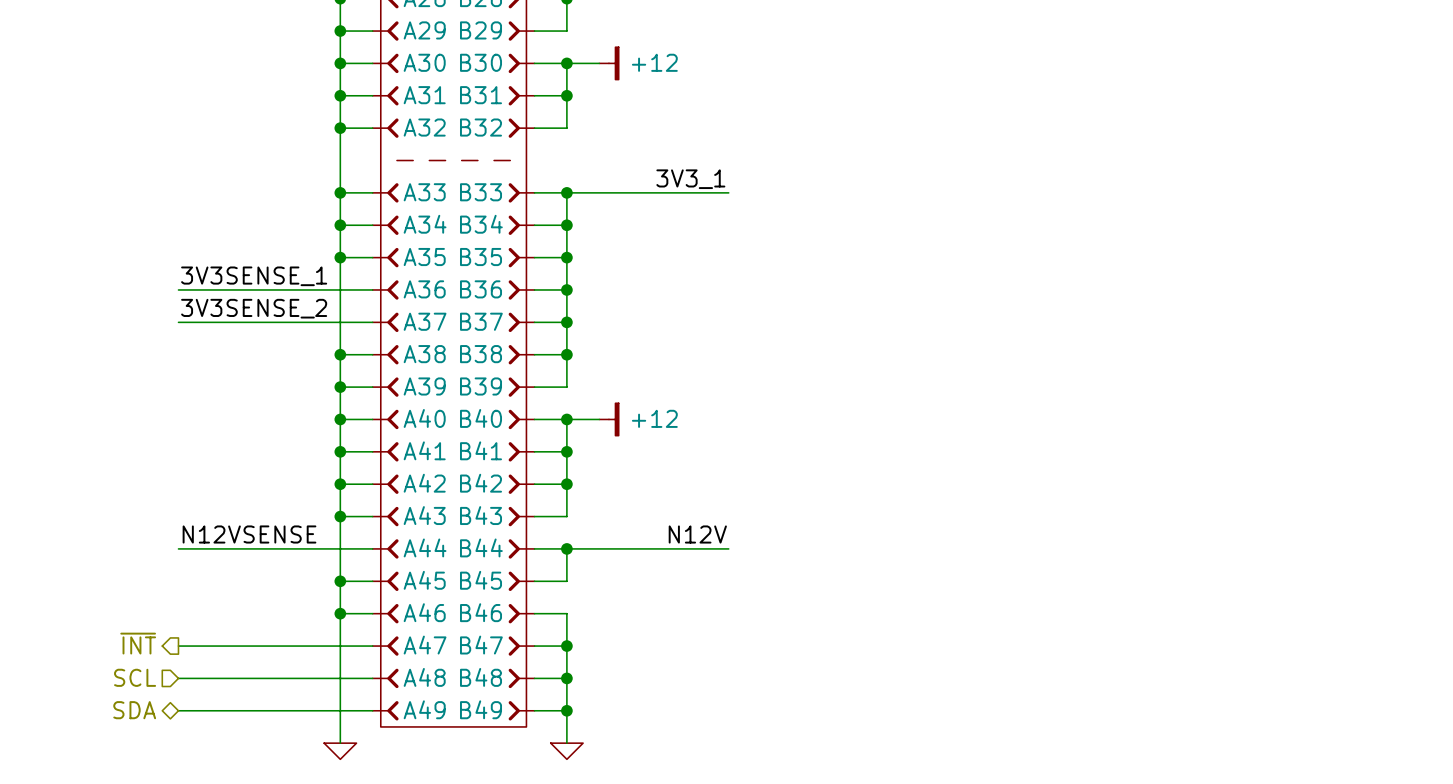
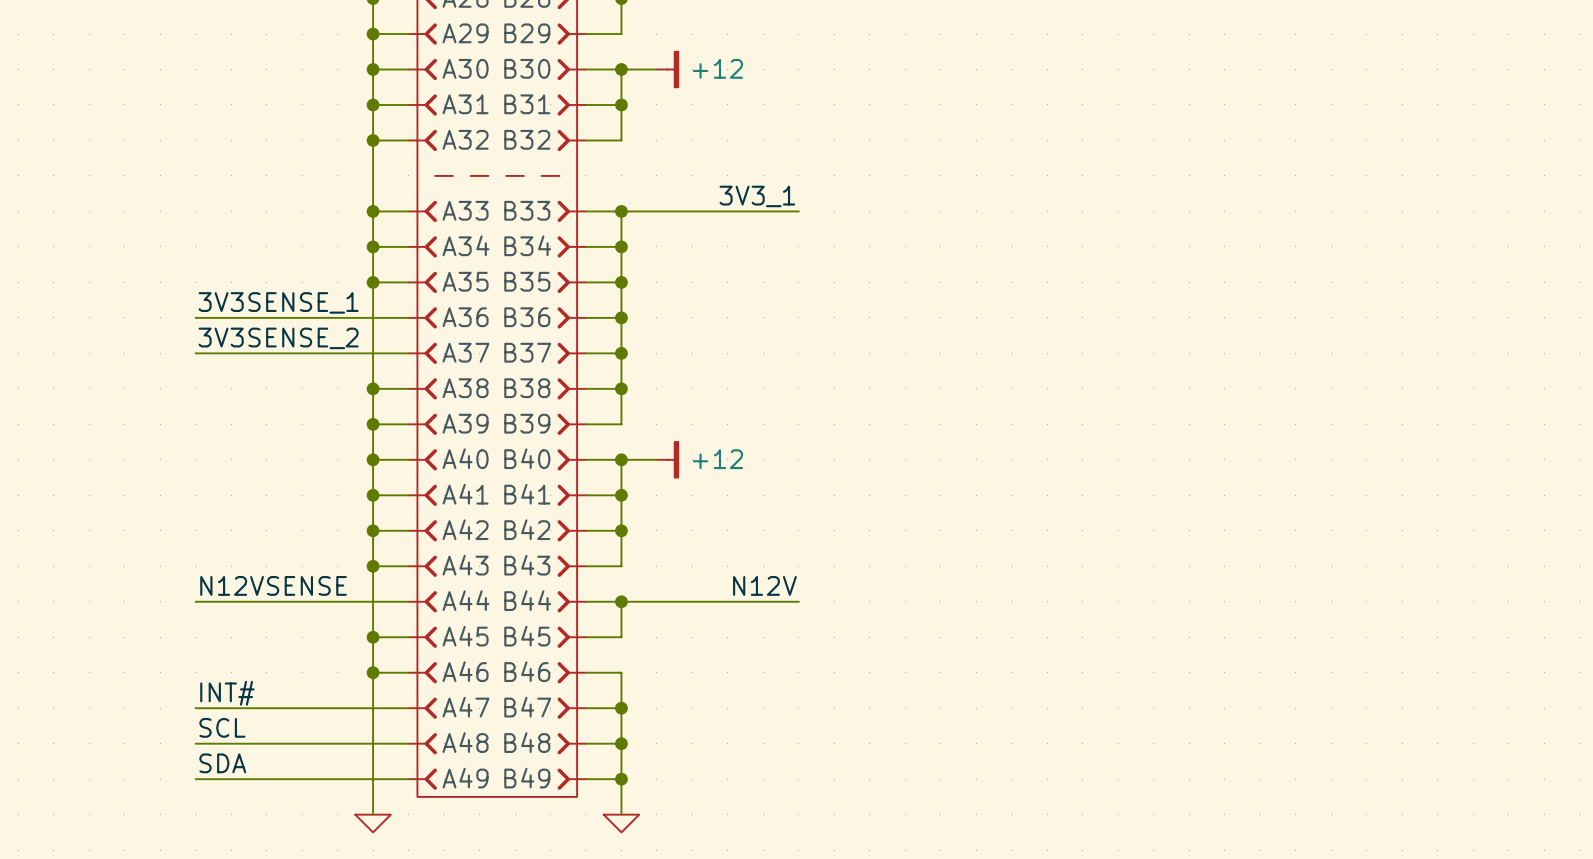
label: none -> INT# (227, 693)
hierarchical label: ~{INT} (138, 643) -> none
label: none -> SCL (222, 727)
hierarchical label: SCL (135, 677) -> none
label: none -> SDA (222, 763)
hierarchical label: SDA (134, 710) -> none

